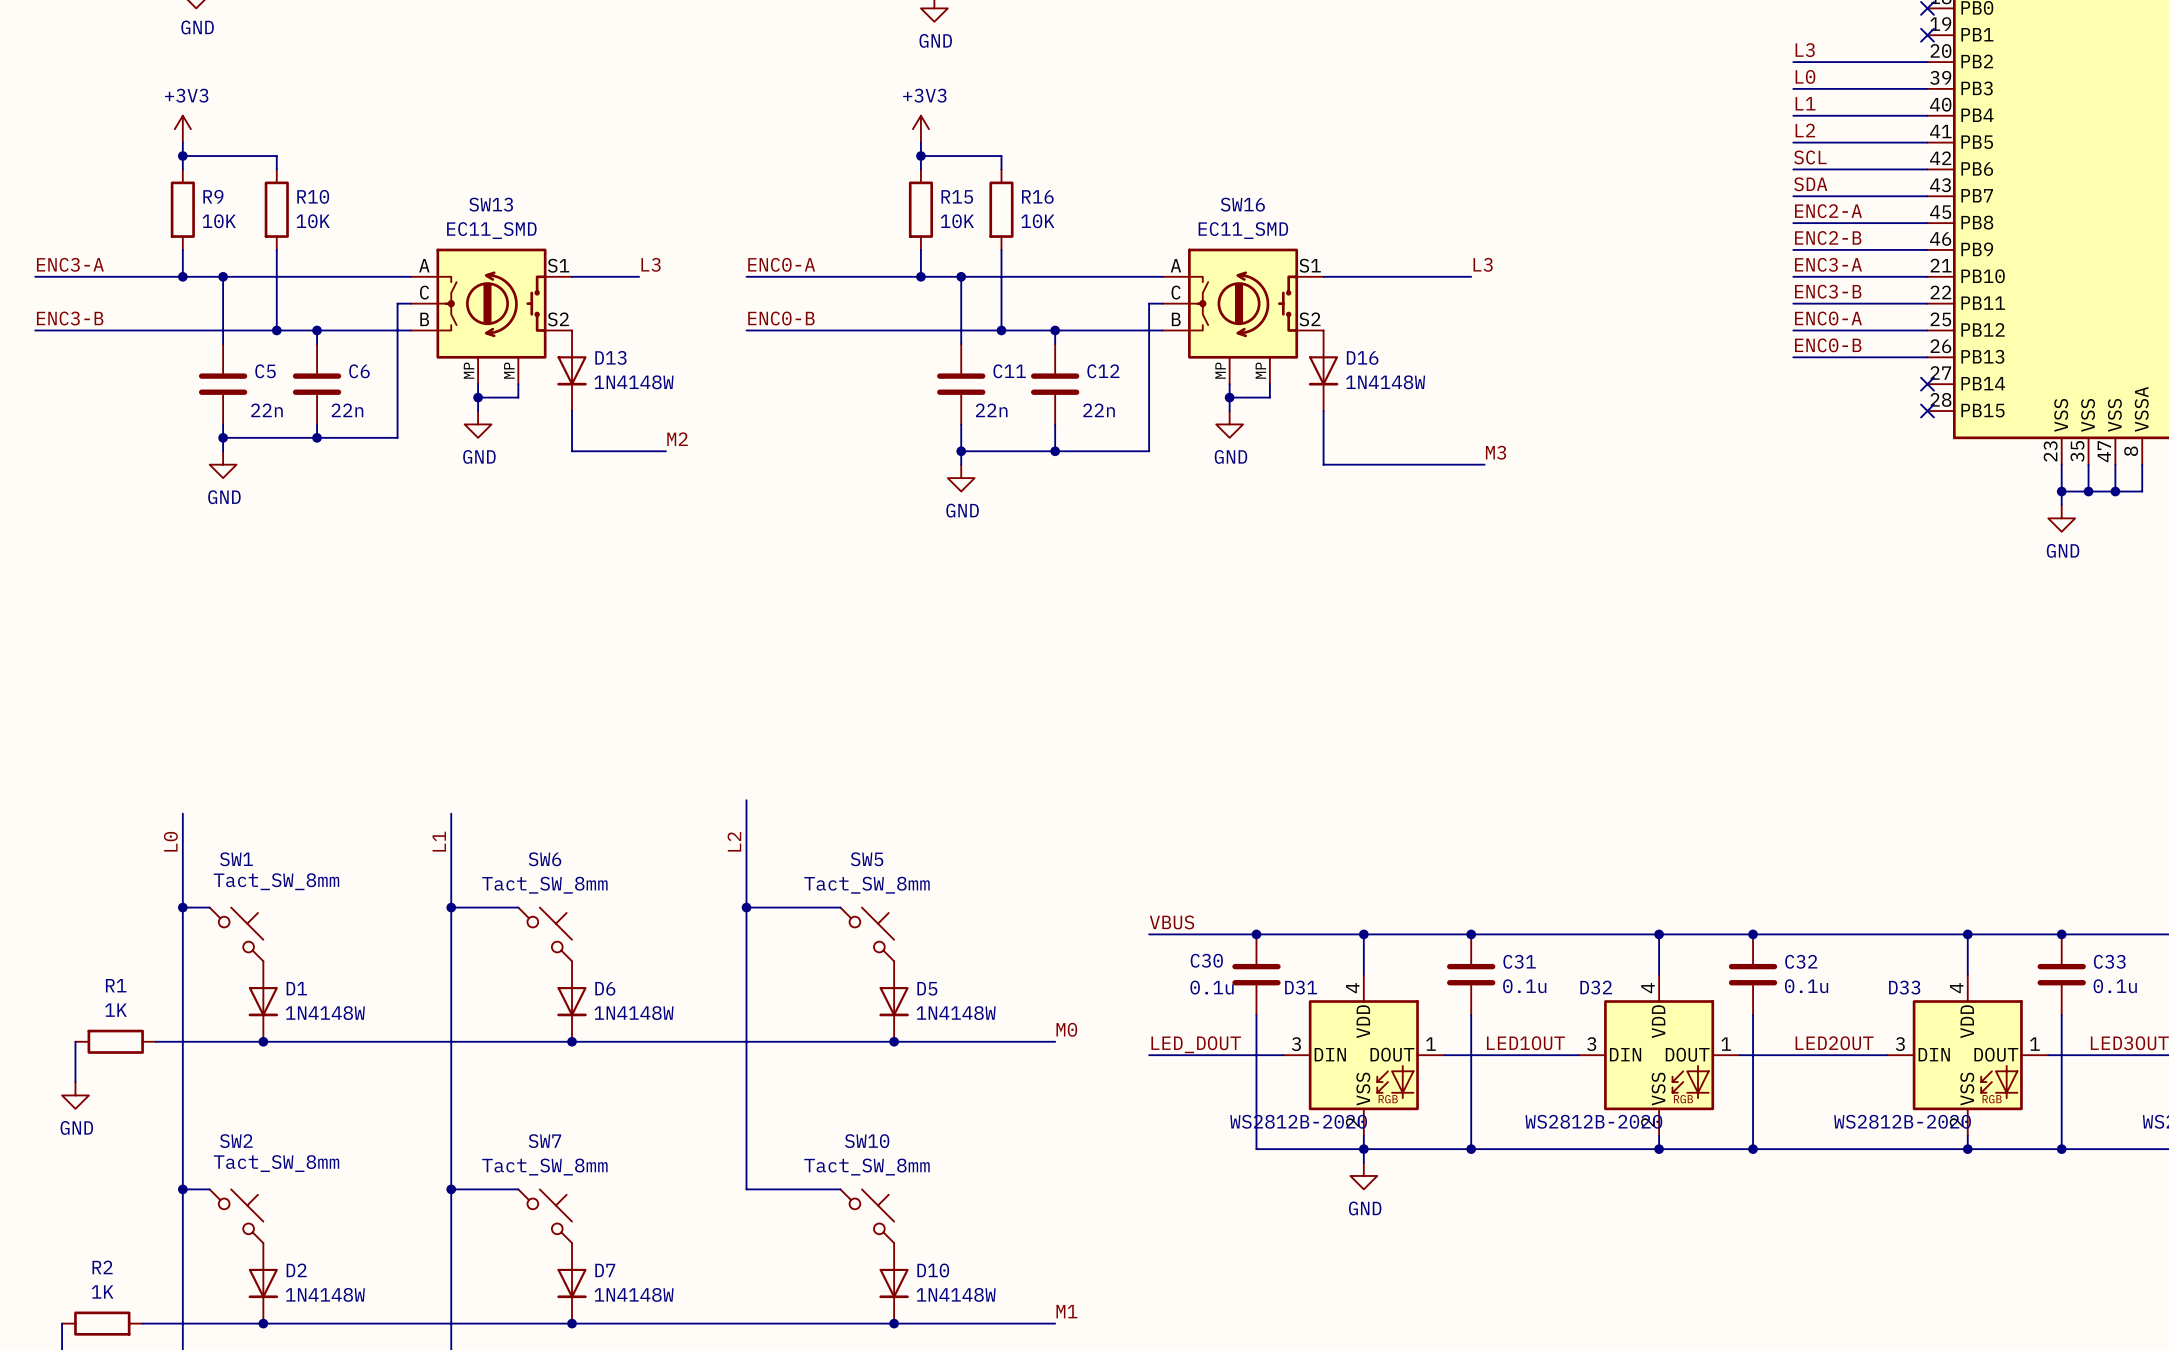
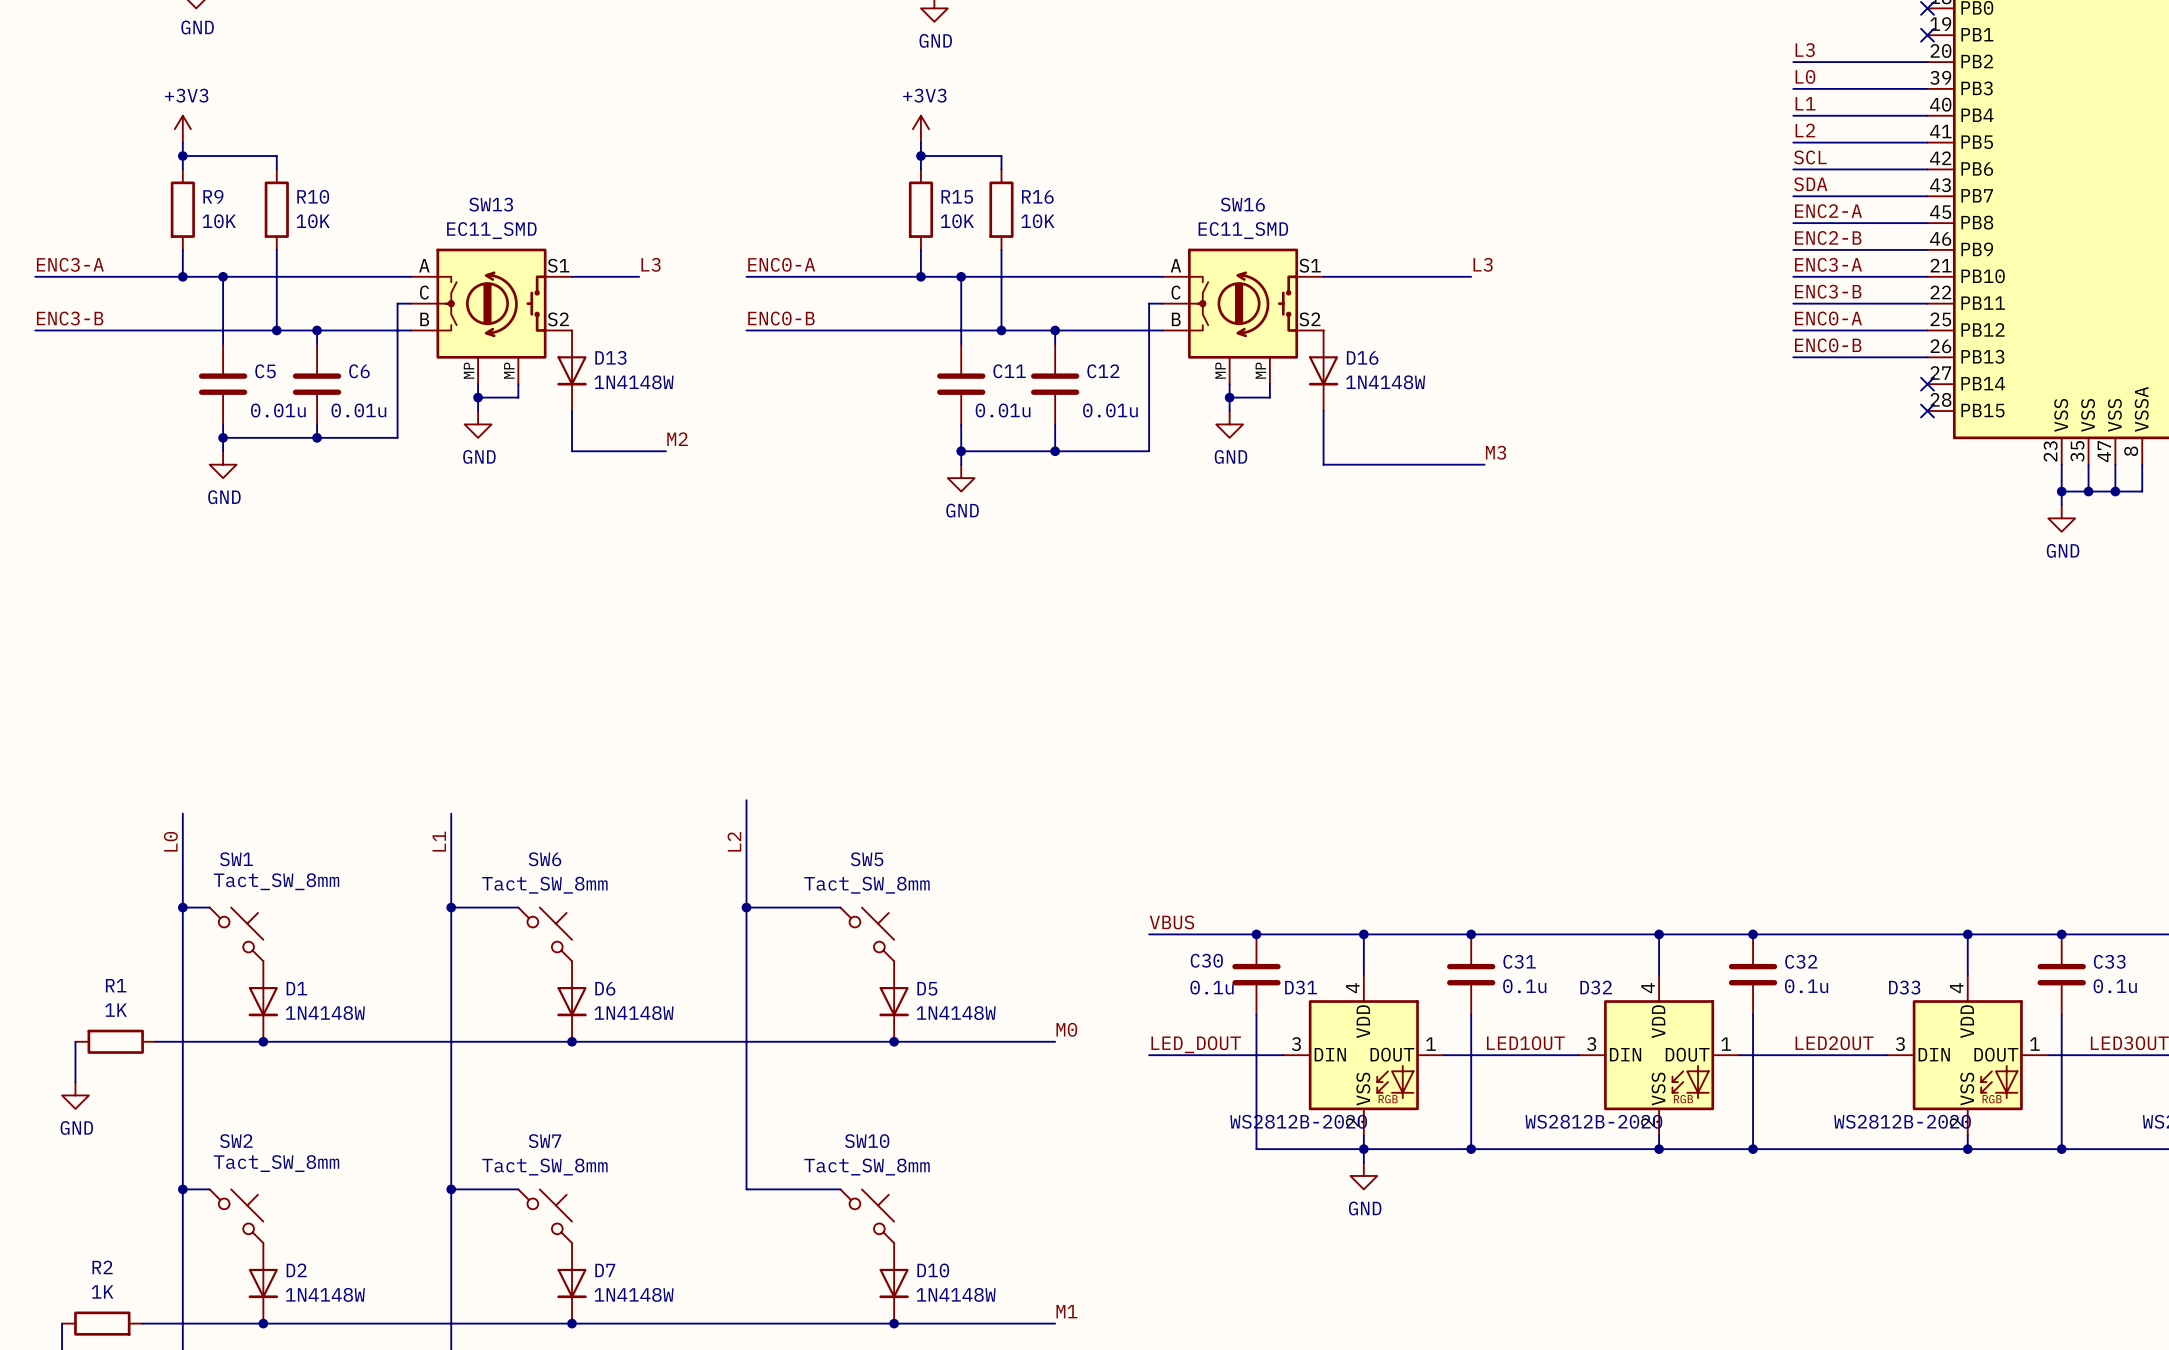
C5 value: 22n (266, 410) -> 0.01u (278, 410)
C6 value: 22n (347, 410) -> 0.01u (358, 410)
C11 value: 22n (991, 410) -> 0.01u (1003, 410)
C12 value: 22n (1099, 410) -> 0.01u (1110, 410)

